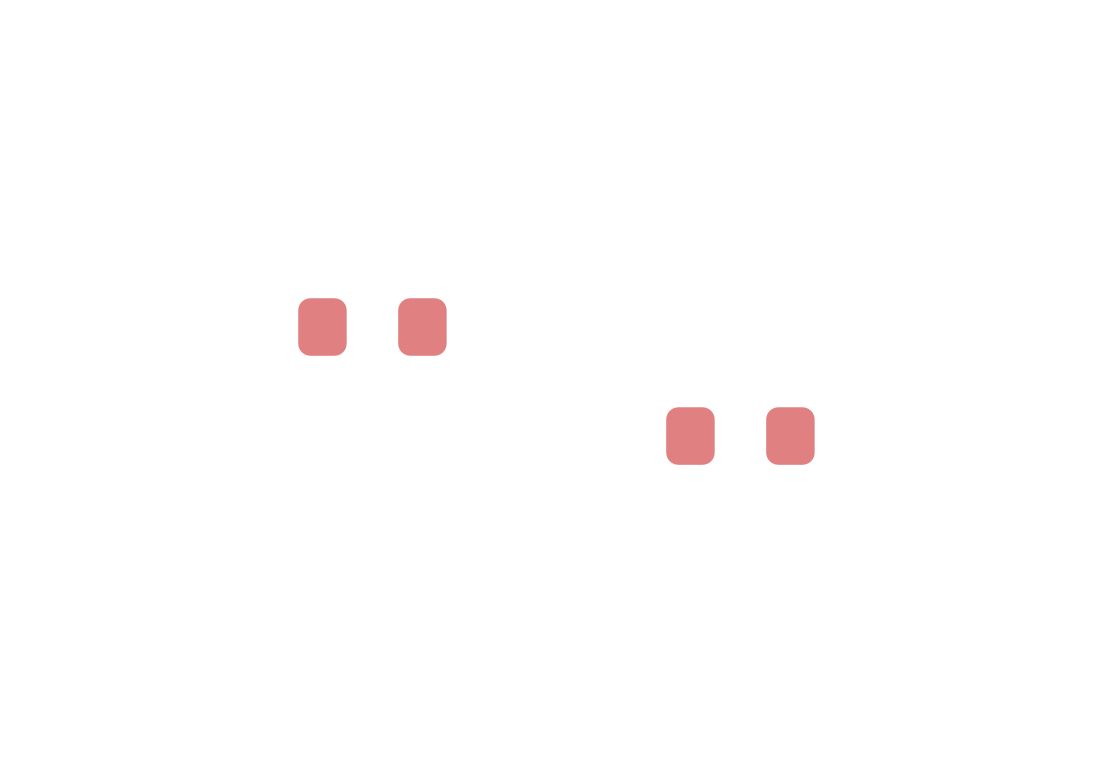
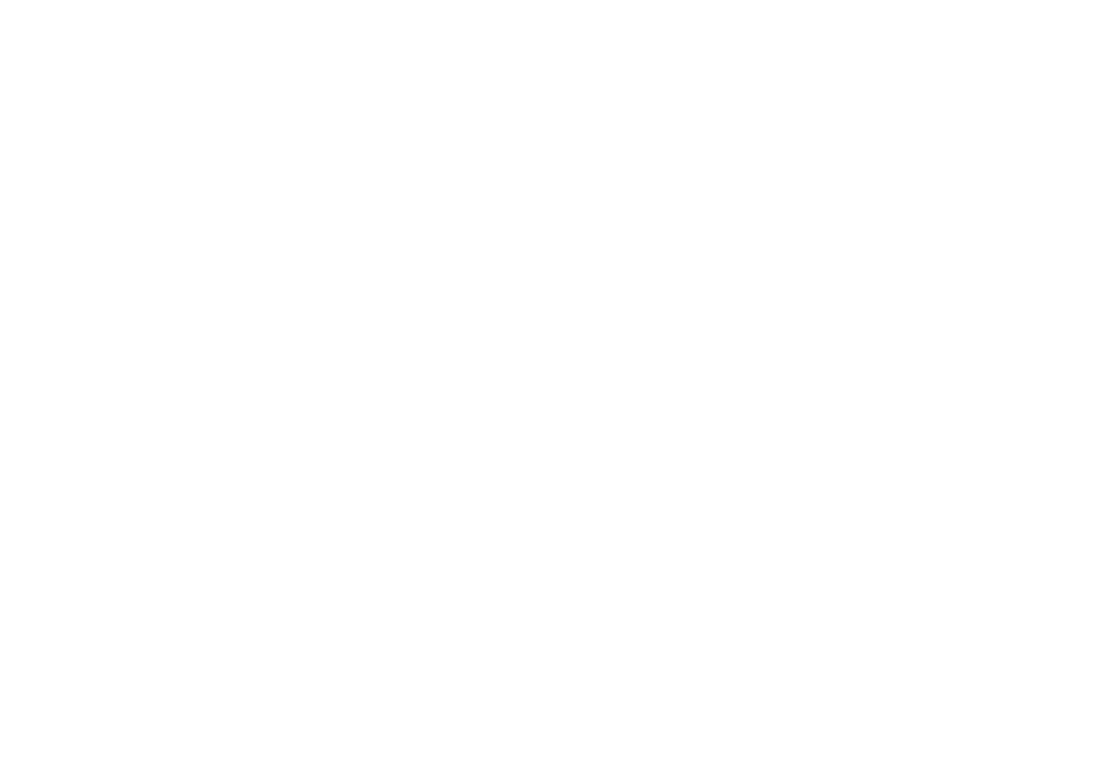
part: (372, 327) -> none
part: (740, 436) -> none

